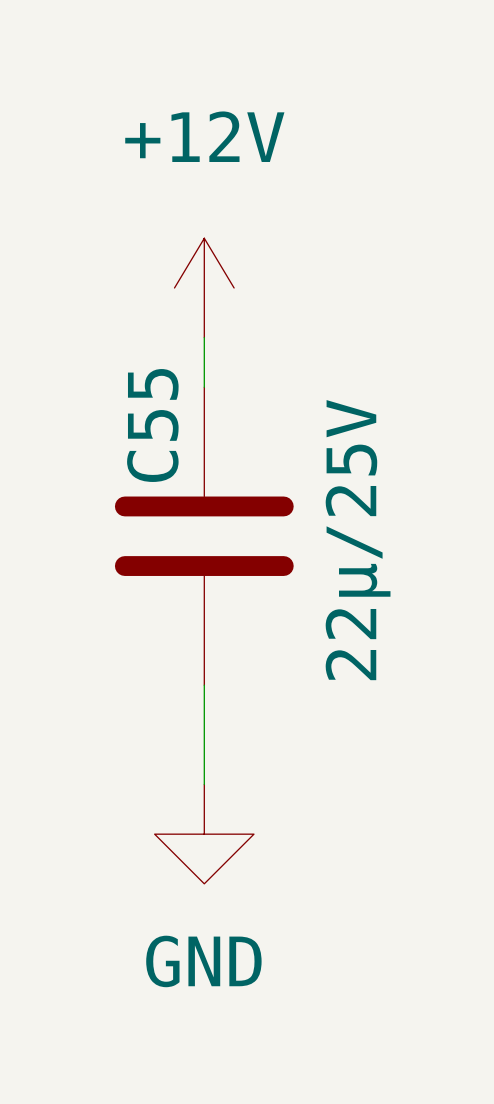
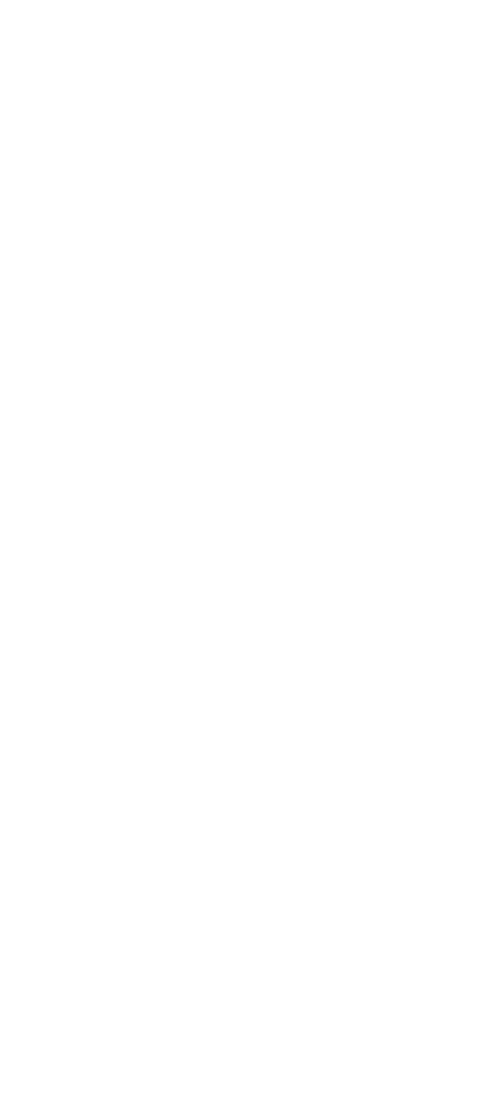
power symbol: +12V (204, 287) -> none
wire: (204, 337) (204, 387) -> none
C55: 22µ/25V (204, 536) -> none
wire: (204, 685) (204, 784) -> none
power symbol: GND (204, 834) -> none

